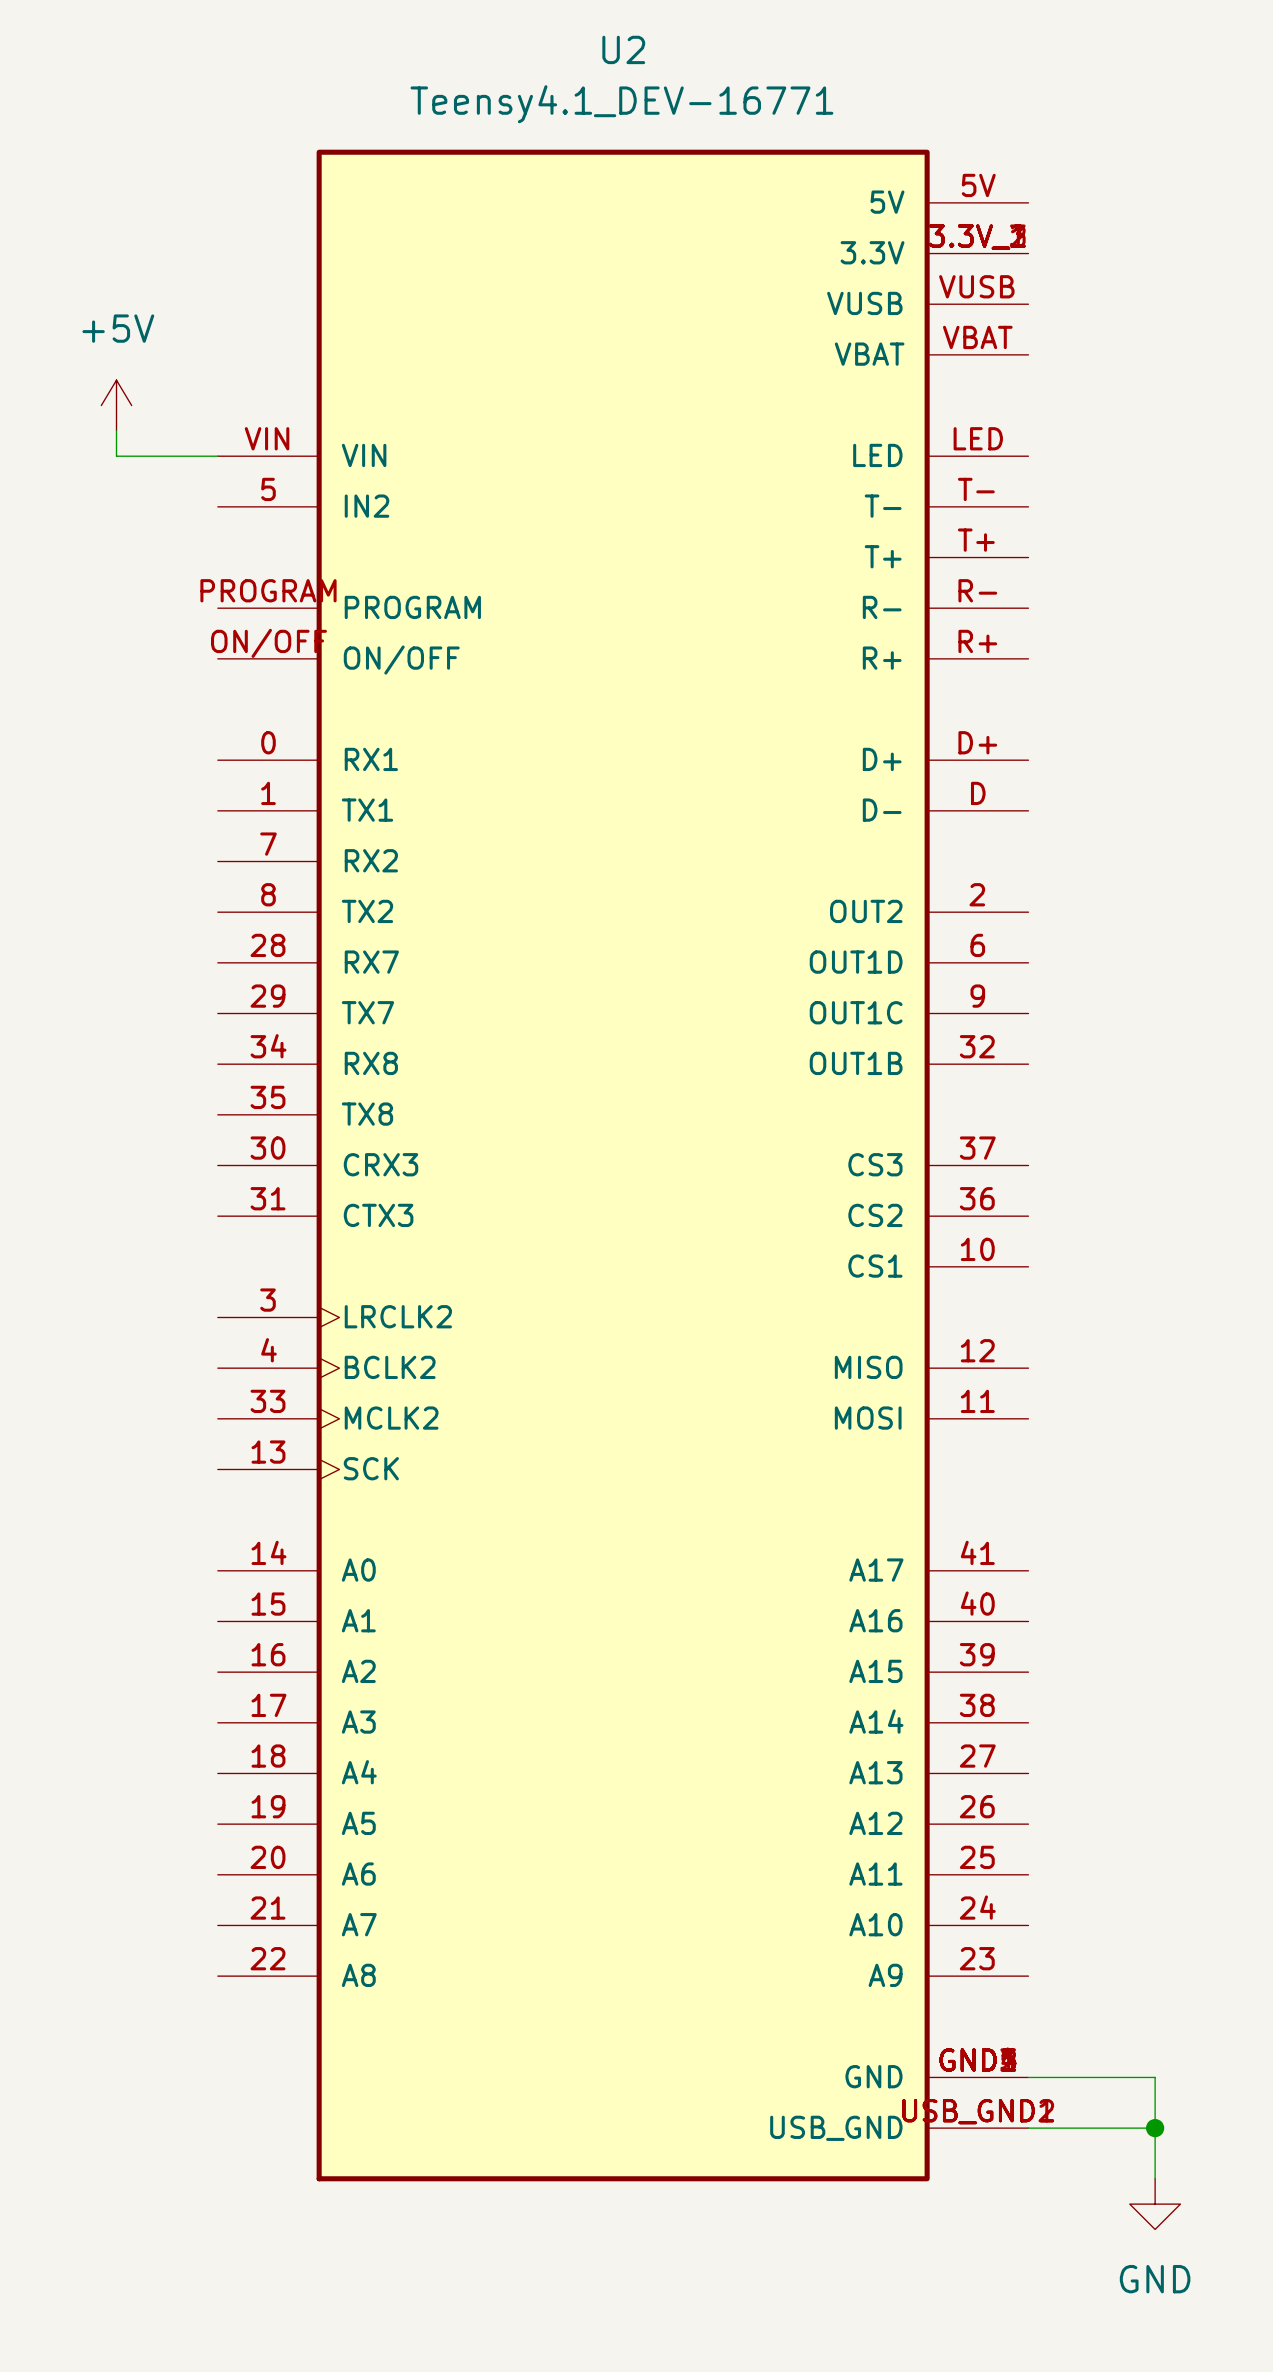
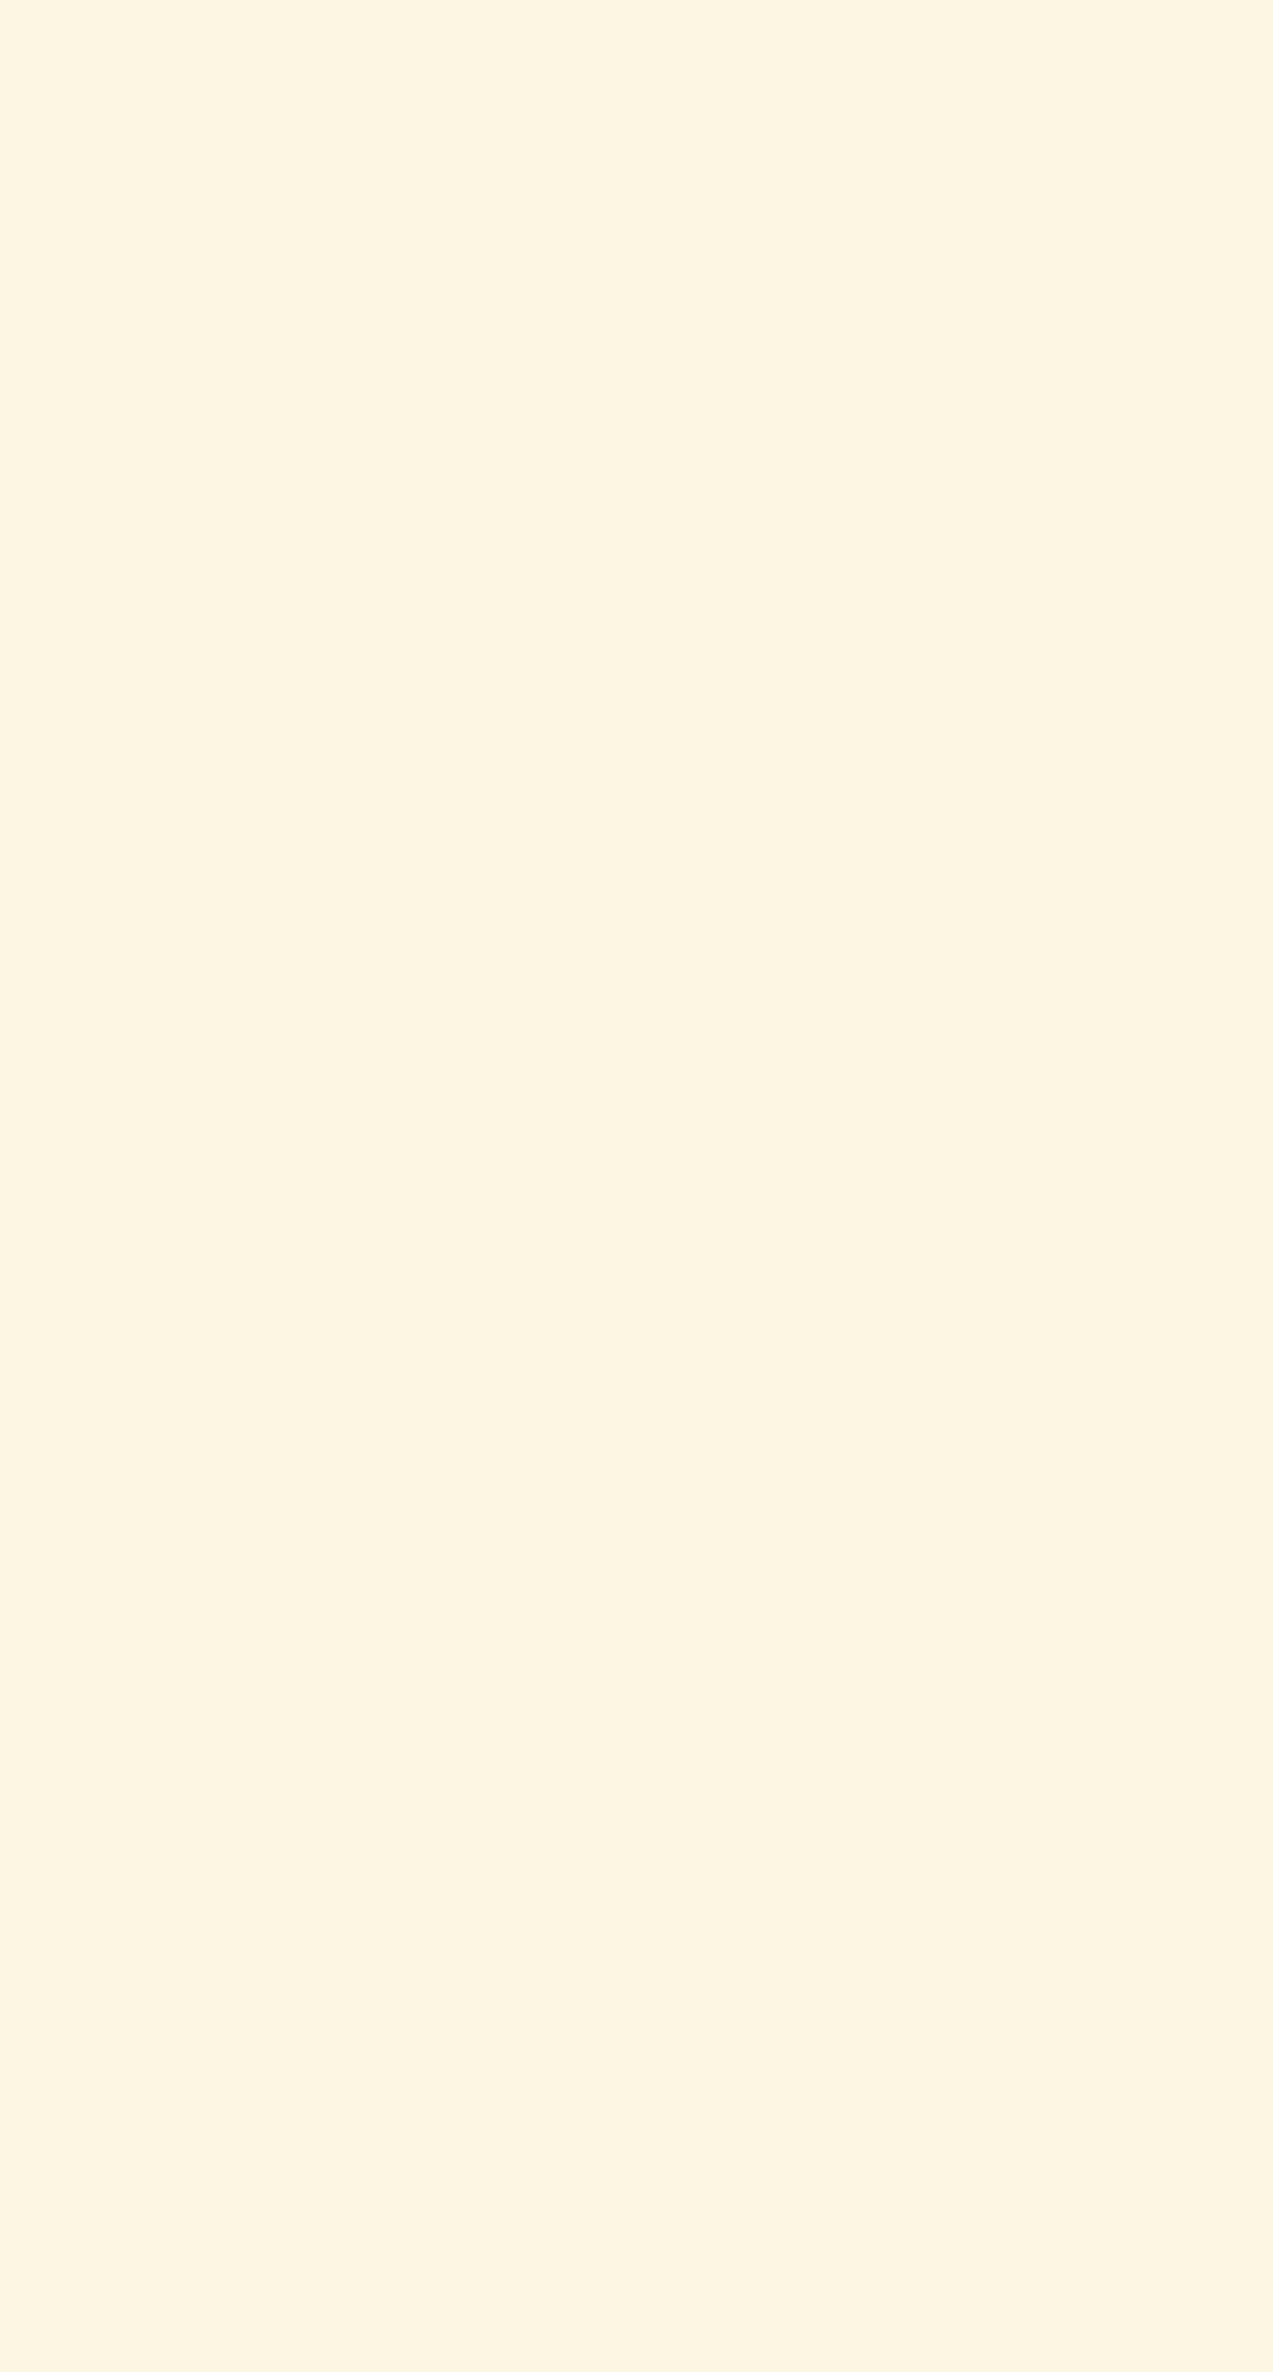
power symbol: +5V (116, 405) -> none
wire: (116, 430) (116, 456) (217, 456) -> none
U2: Teensy4.1_DEV-16771 (623, 1165) -> none
wire: (1028, 2077) (1155, 2077) (1155, 2178) -> none
wire: (1028, 2128) (1155, 2128) -> none
junction: (1155, 2128) -> none
power symbol: GND (1155, 2204) -> none

